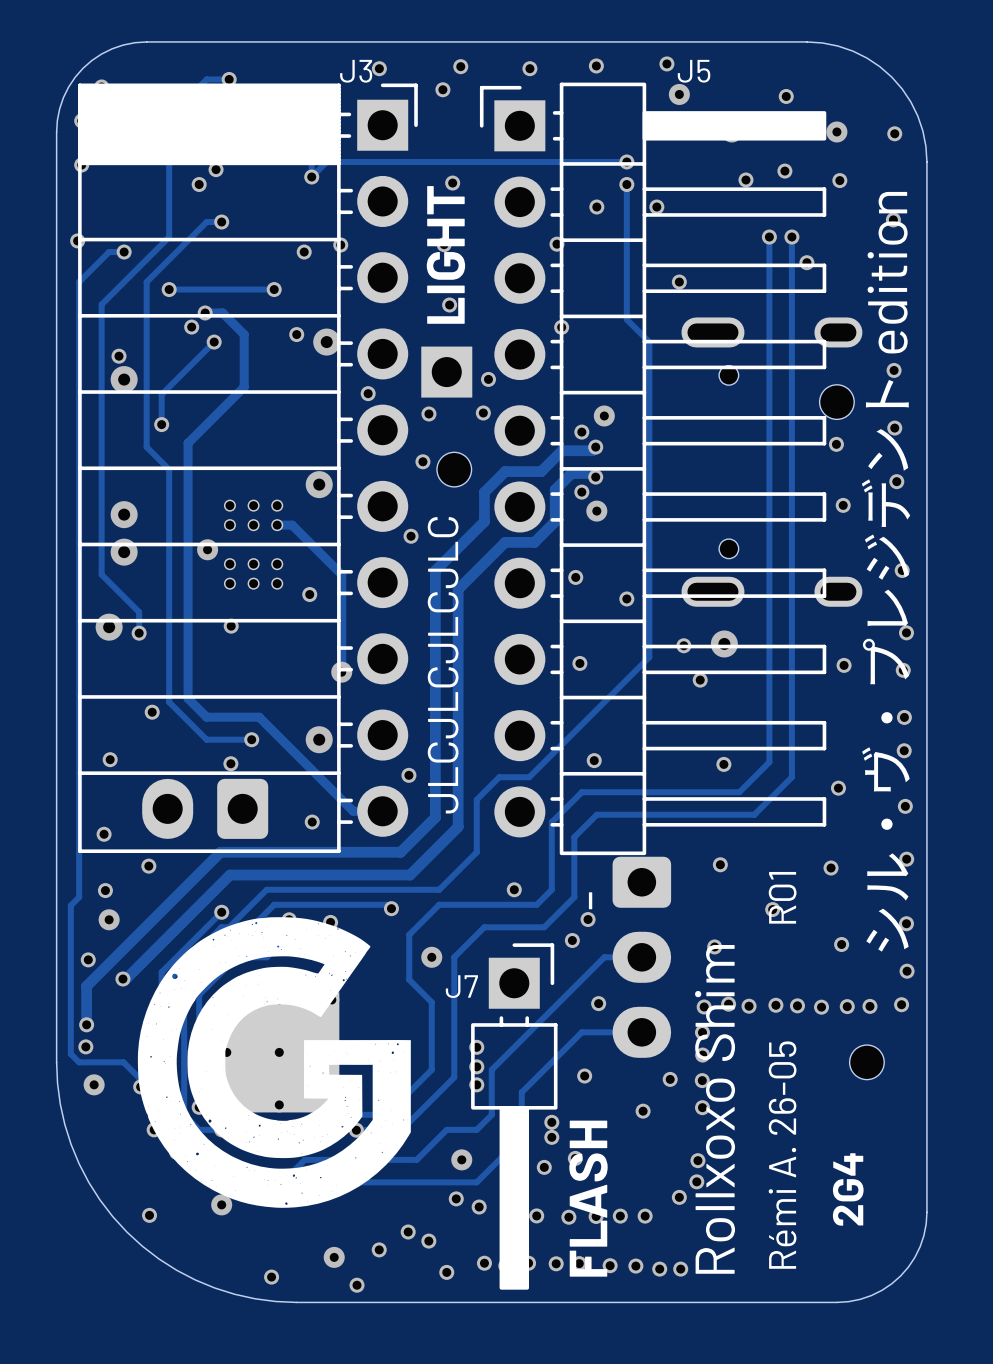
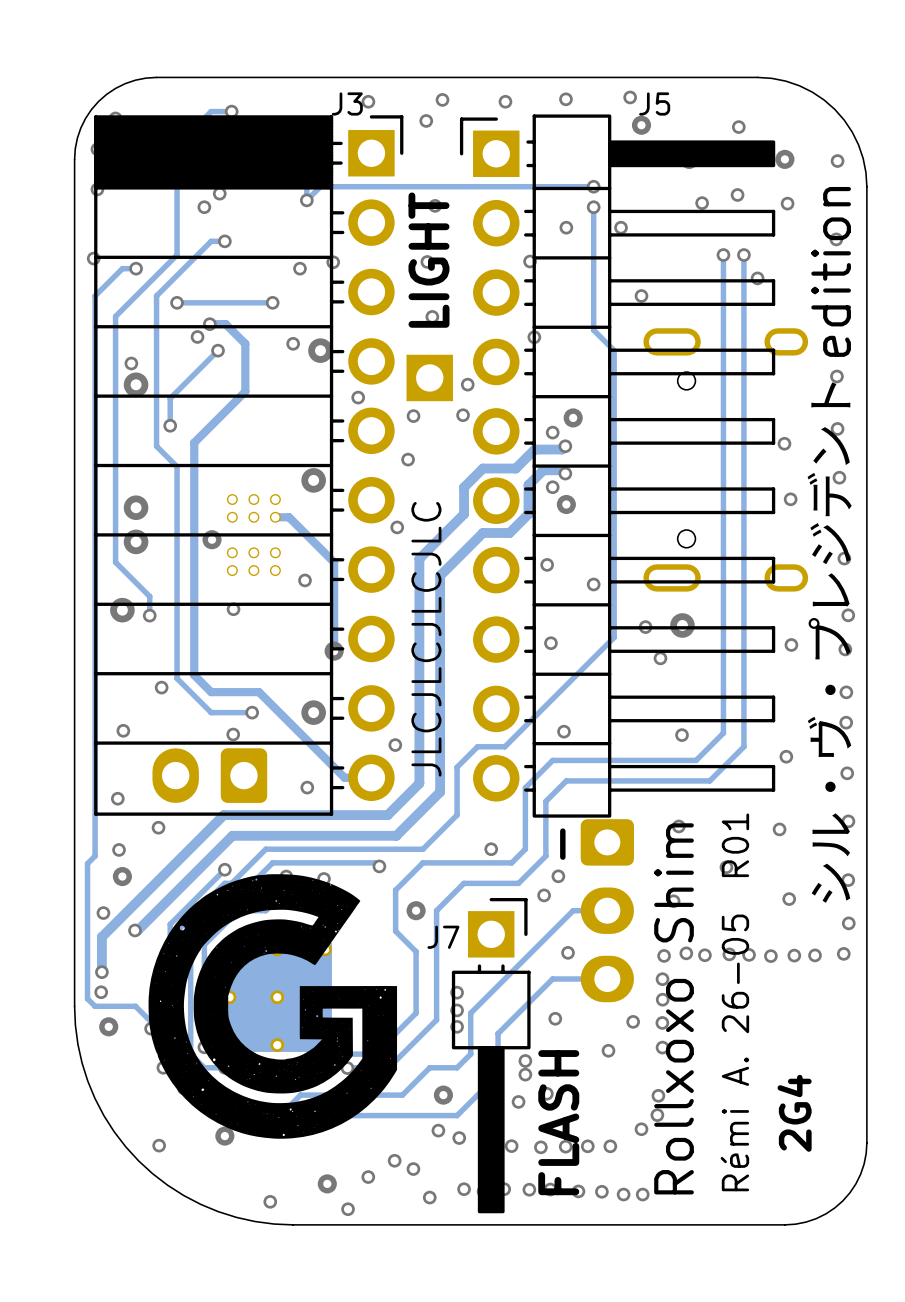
part: (836, 402) -> none
part: (454, 469) -> none
part: (866, 1062) -> none

